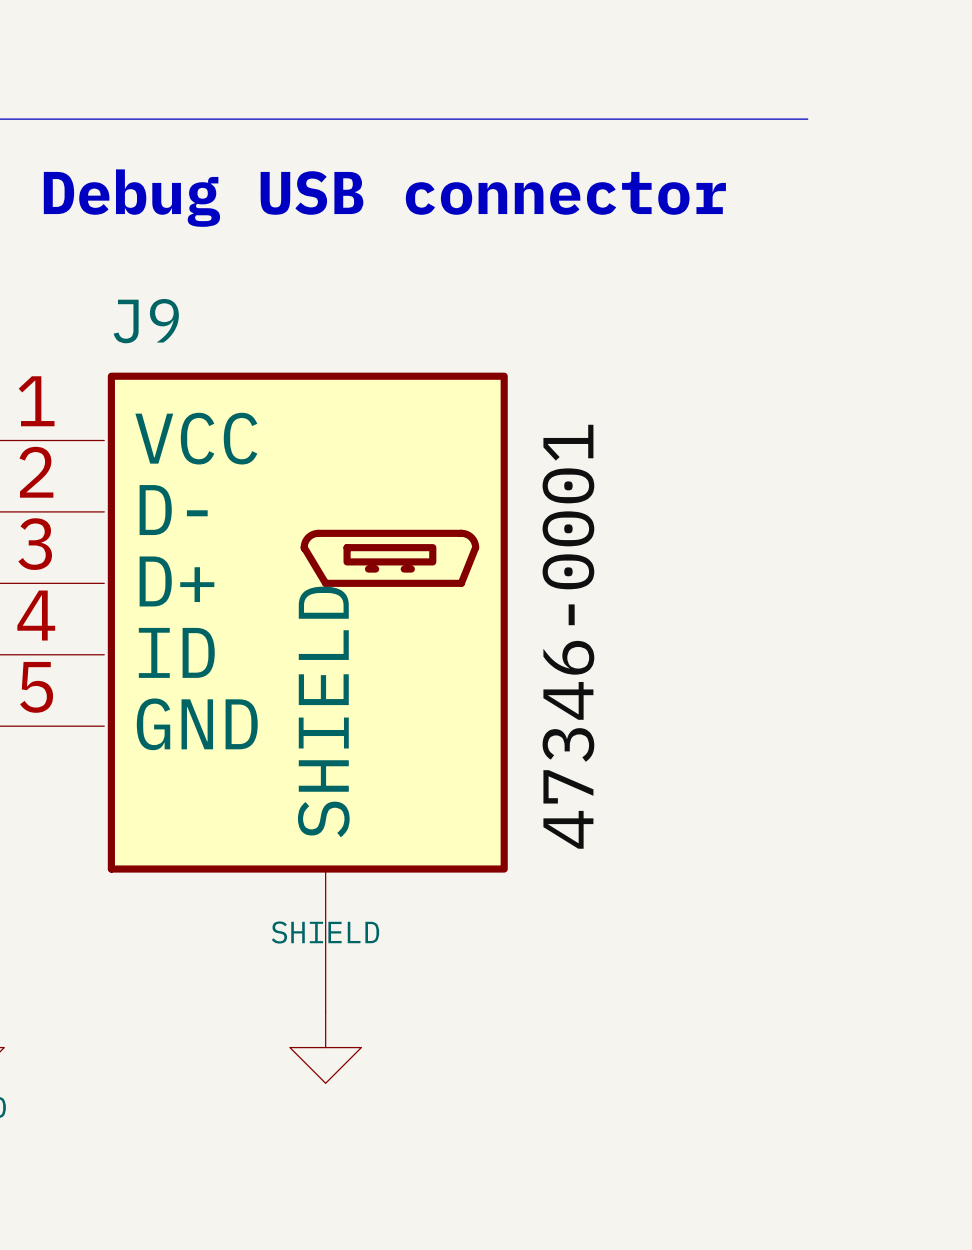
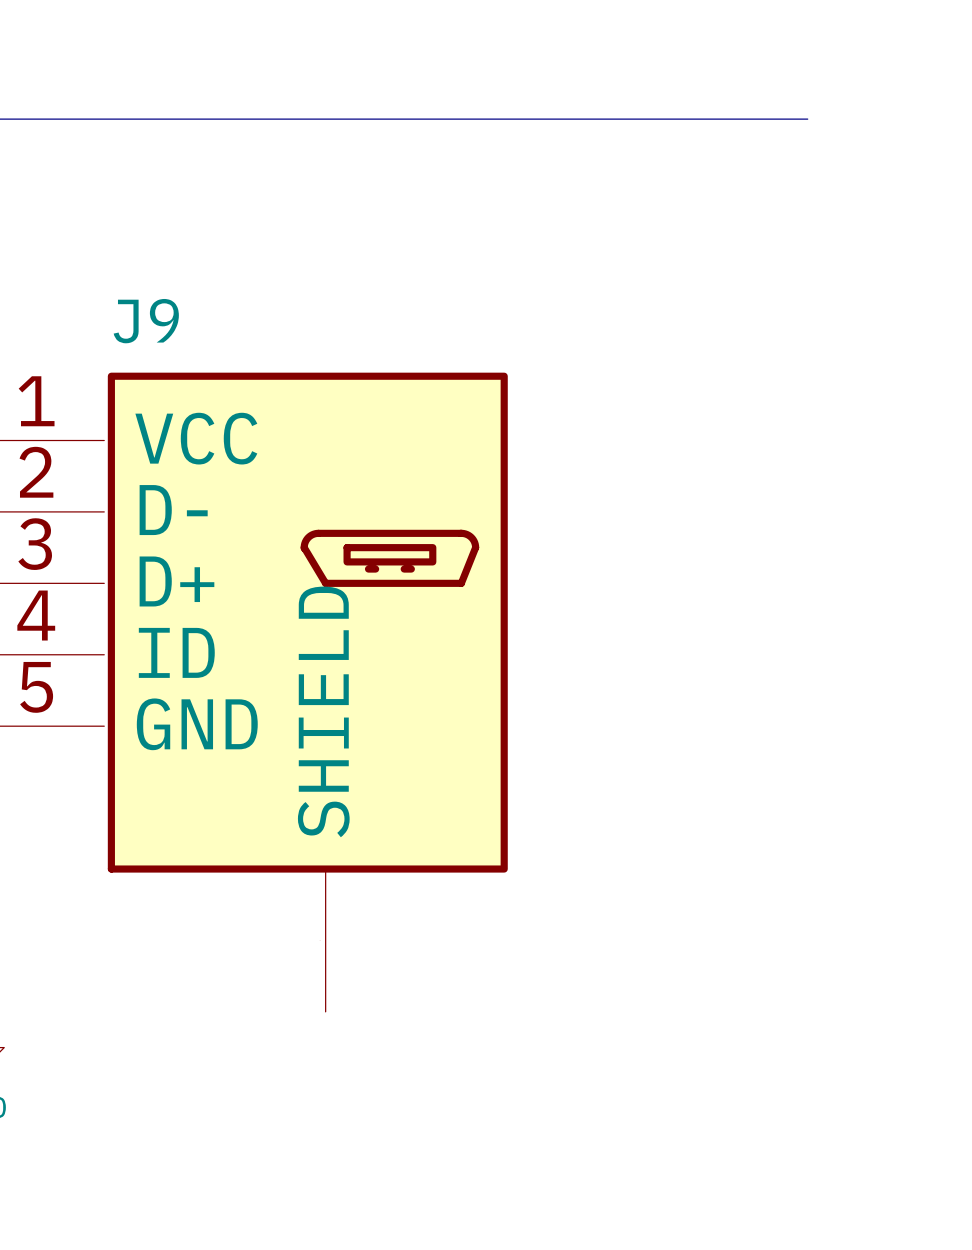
text: Debug USB connector (384, 198) -> none
label: 47346-0001 (568, 636) -> none
power symbol: SHIELD (325, 1047) -> none

